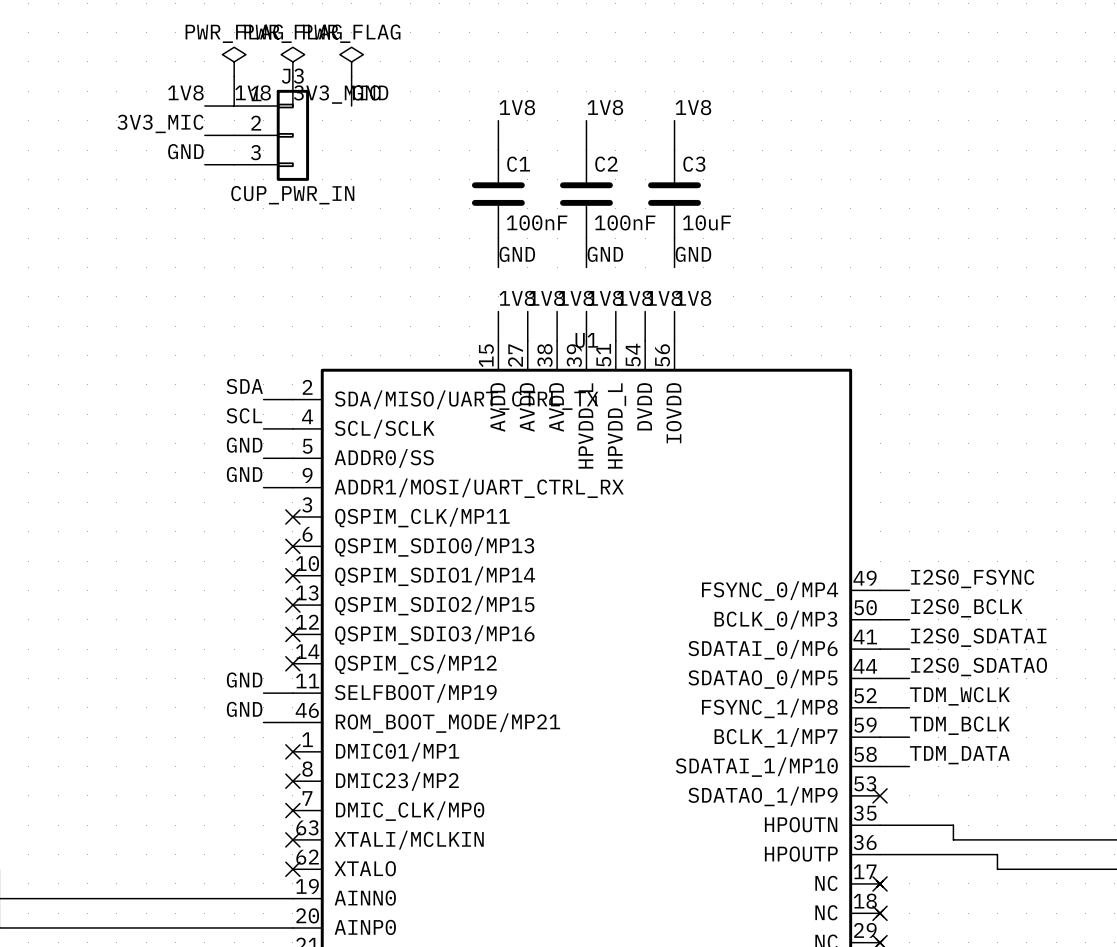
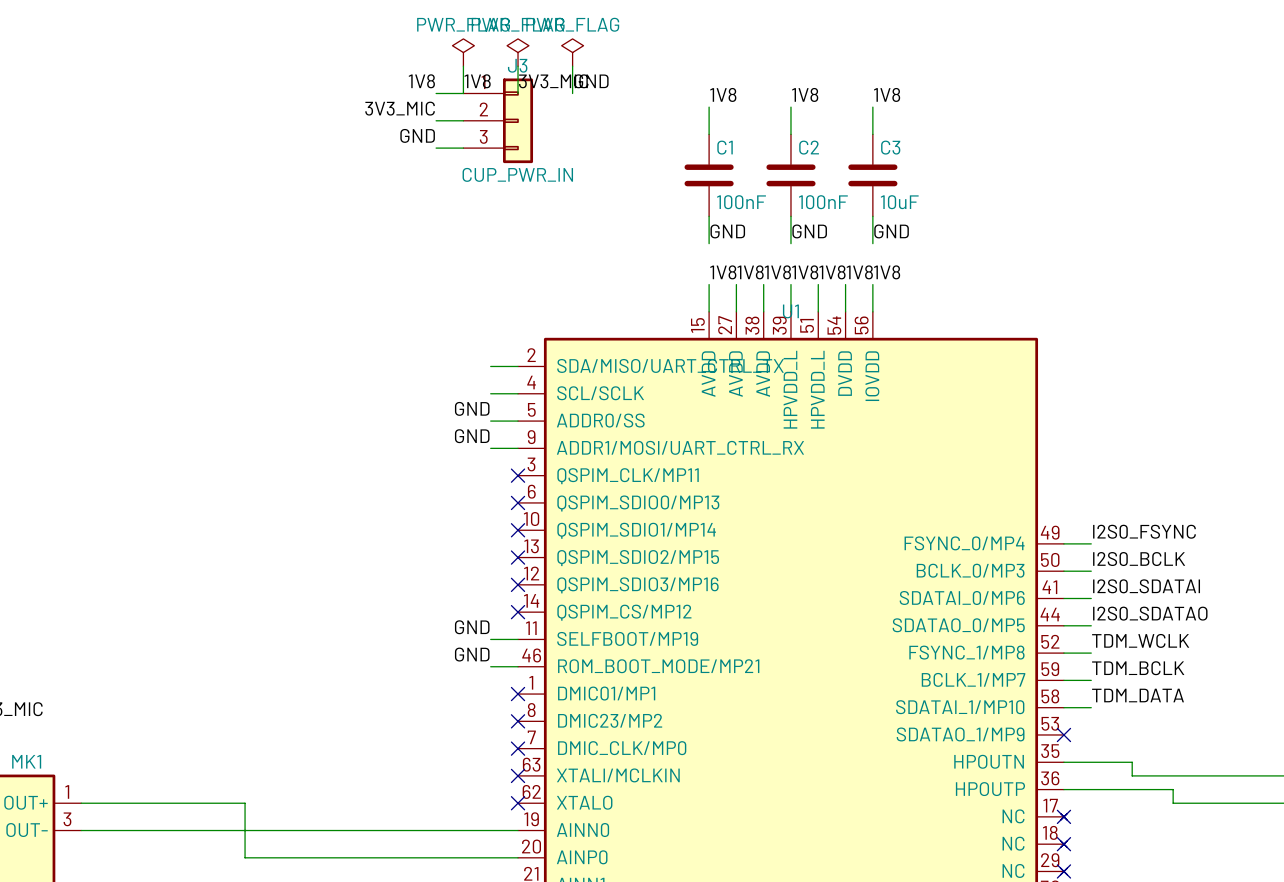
label: SDA (244, 386) -> none
label: SCL (244, 415) -> none

